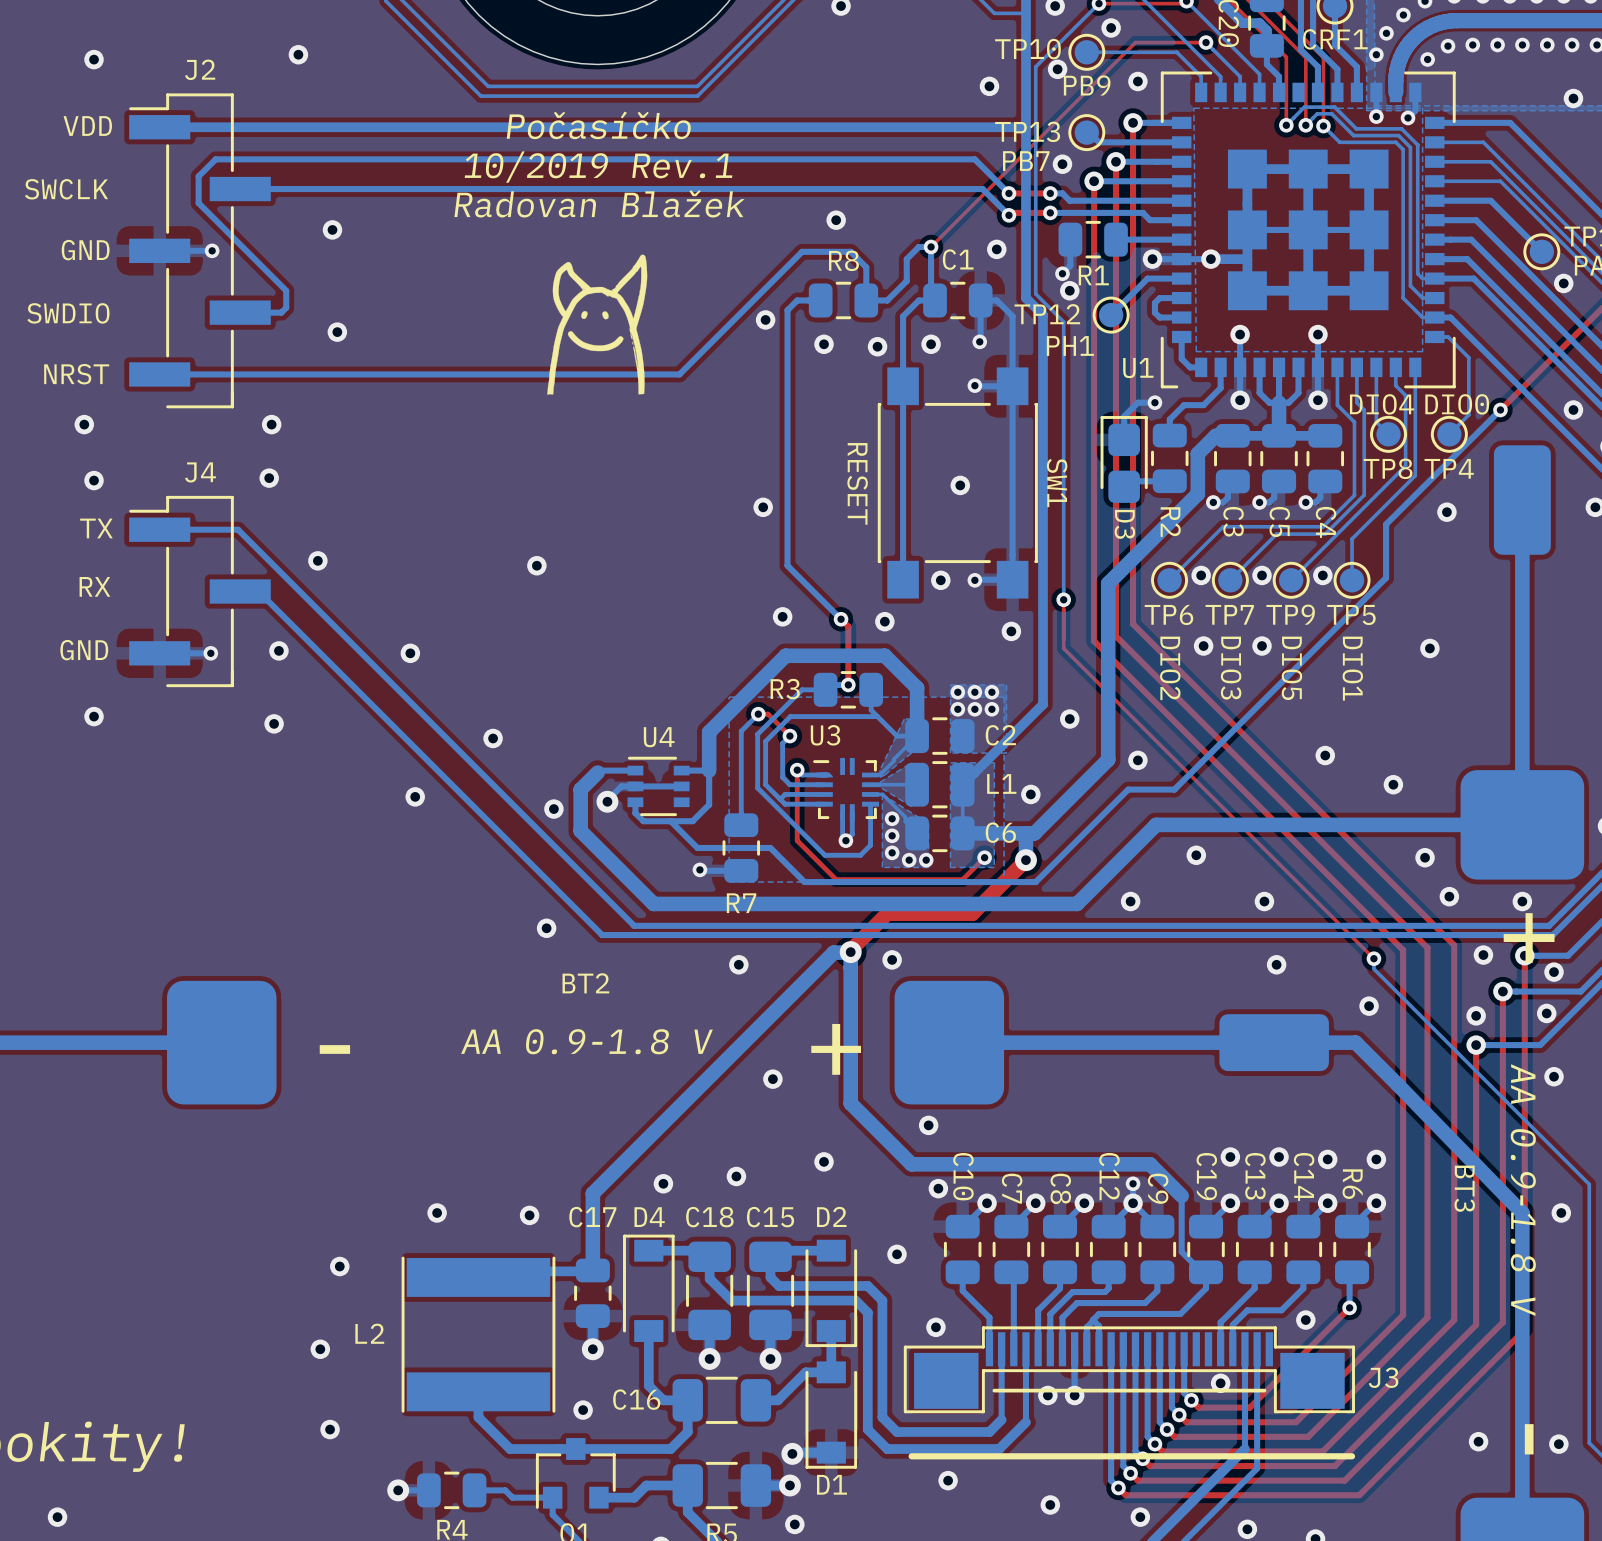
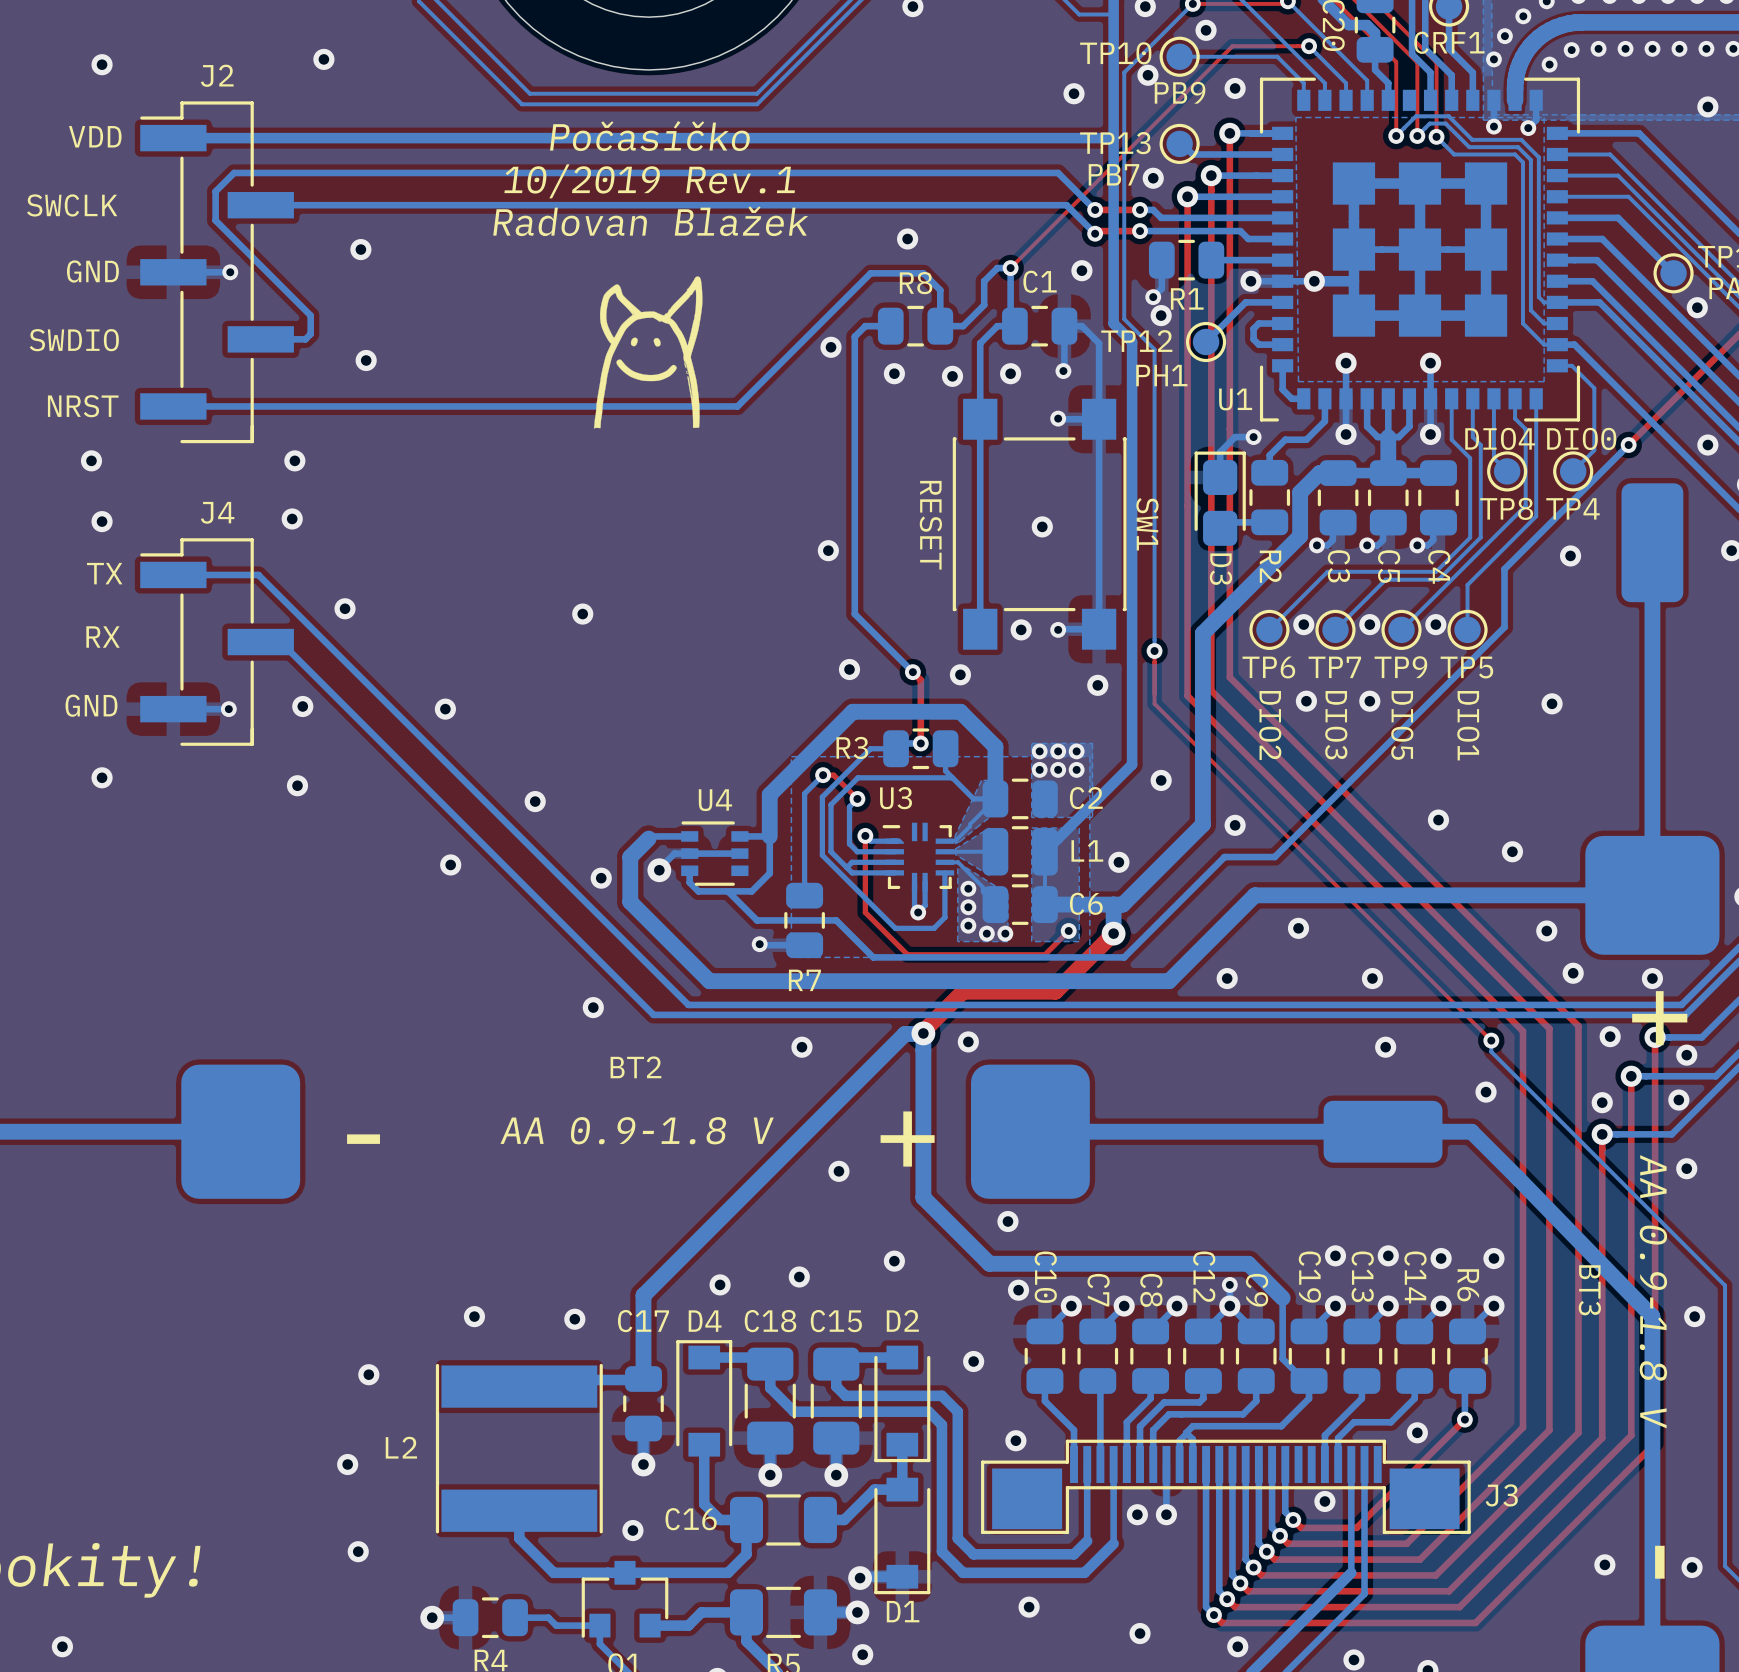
line: (1264, 1390) (994, 1390) -> none
line: (1352, 1456) (911, 1456) -> none

